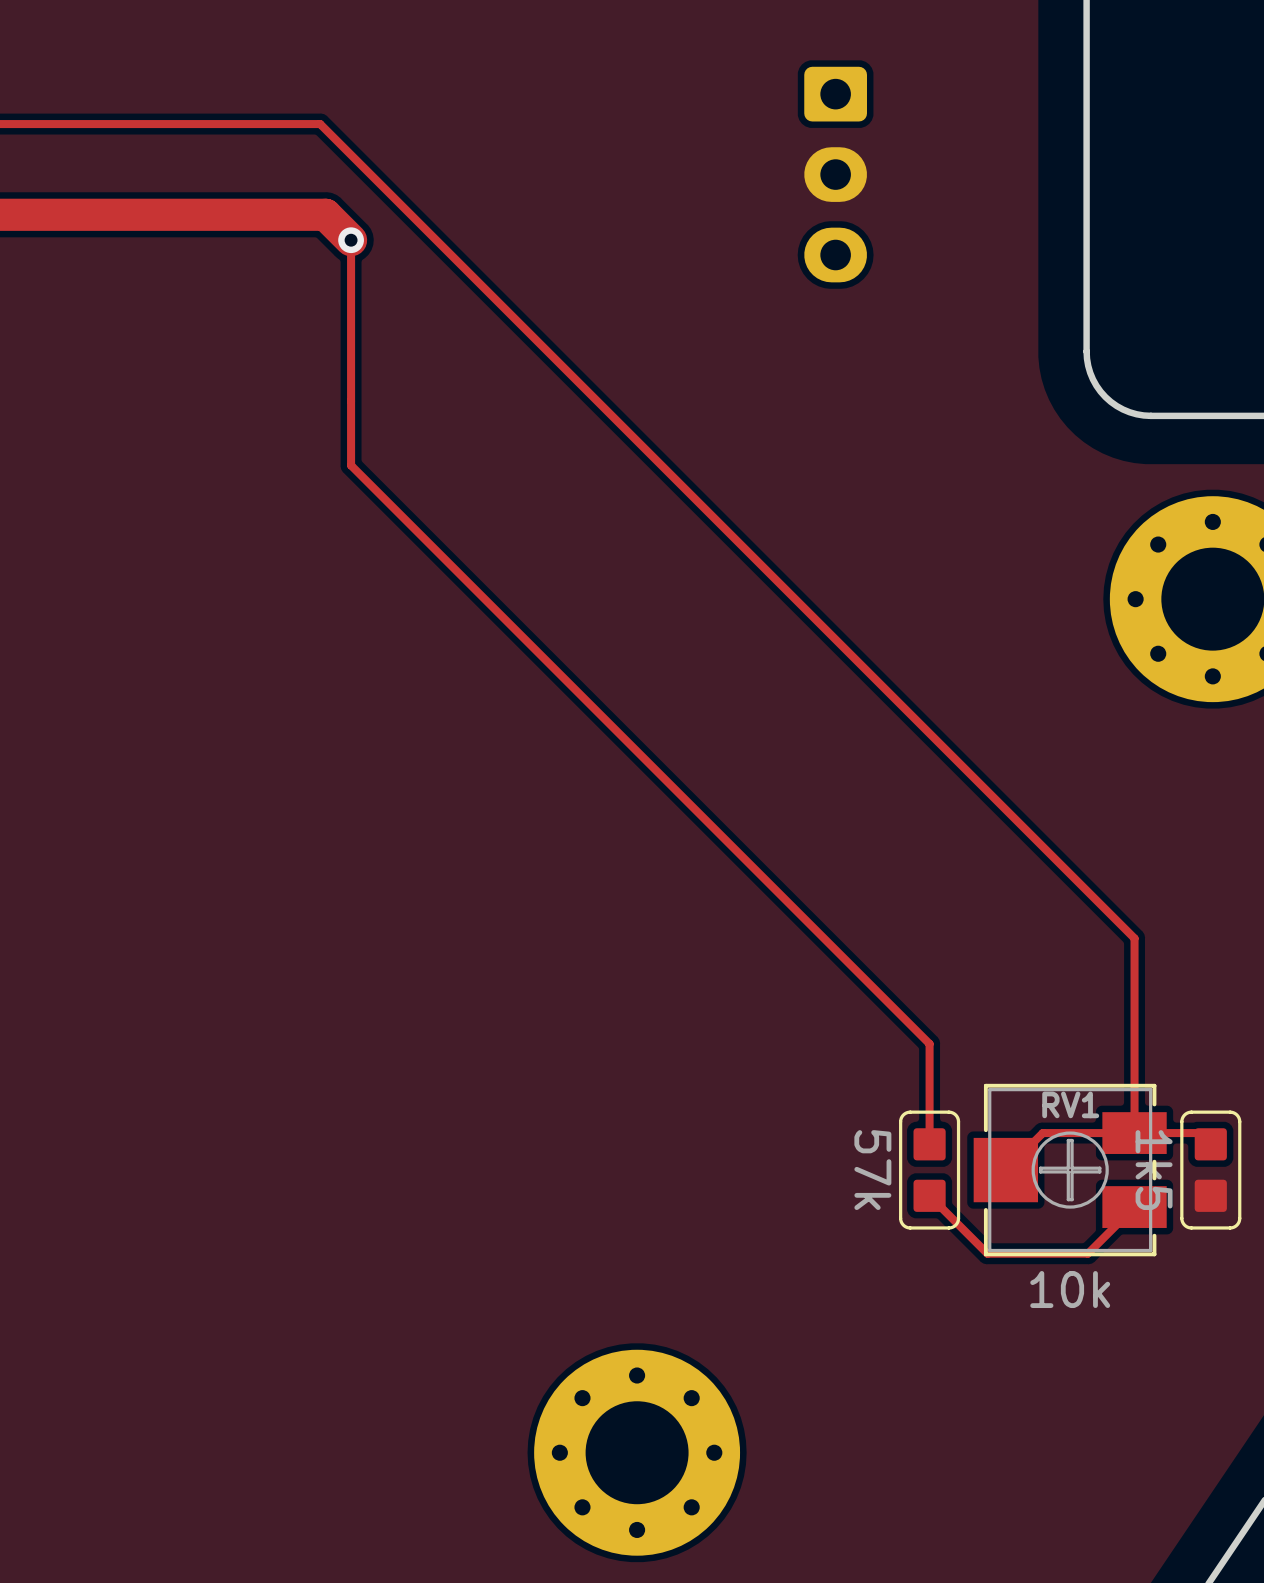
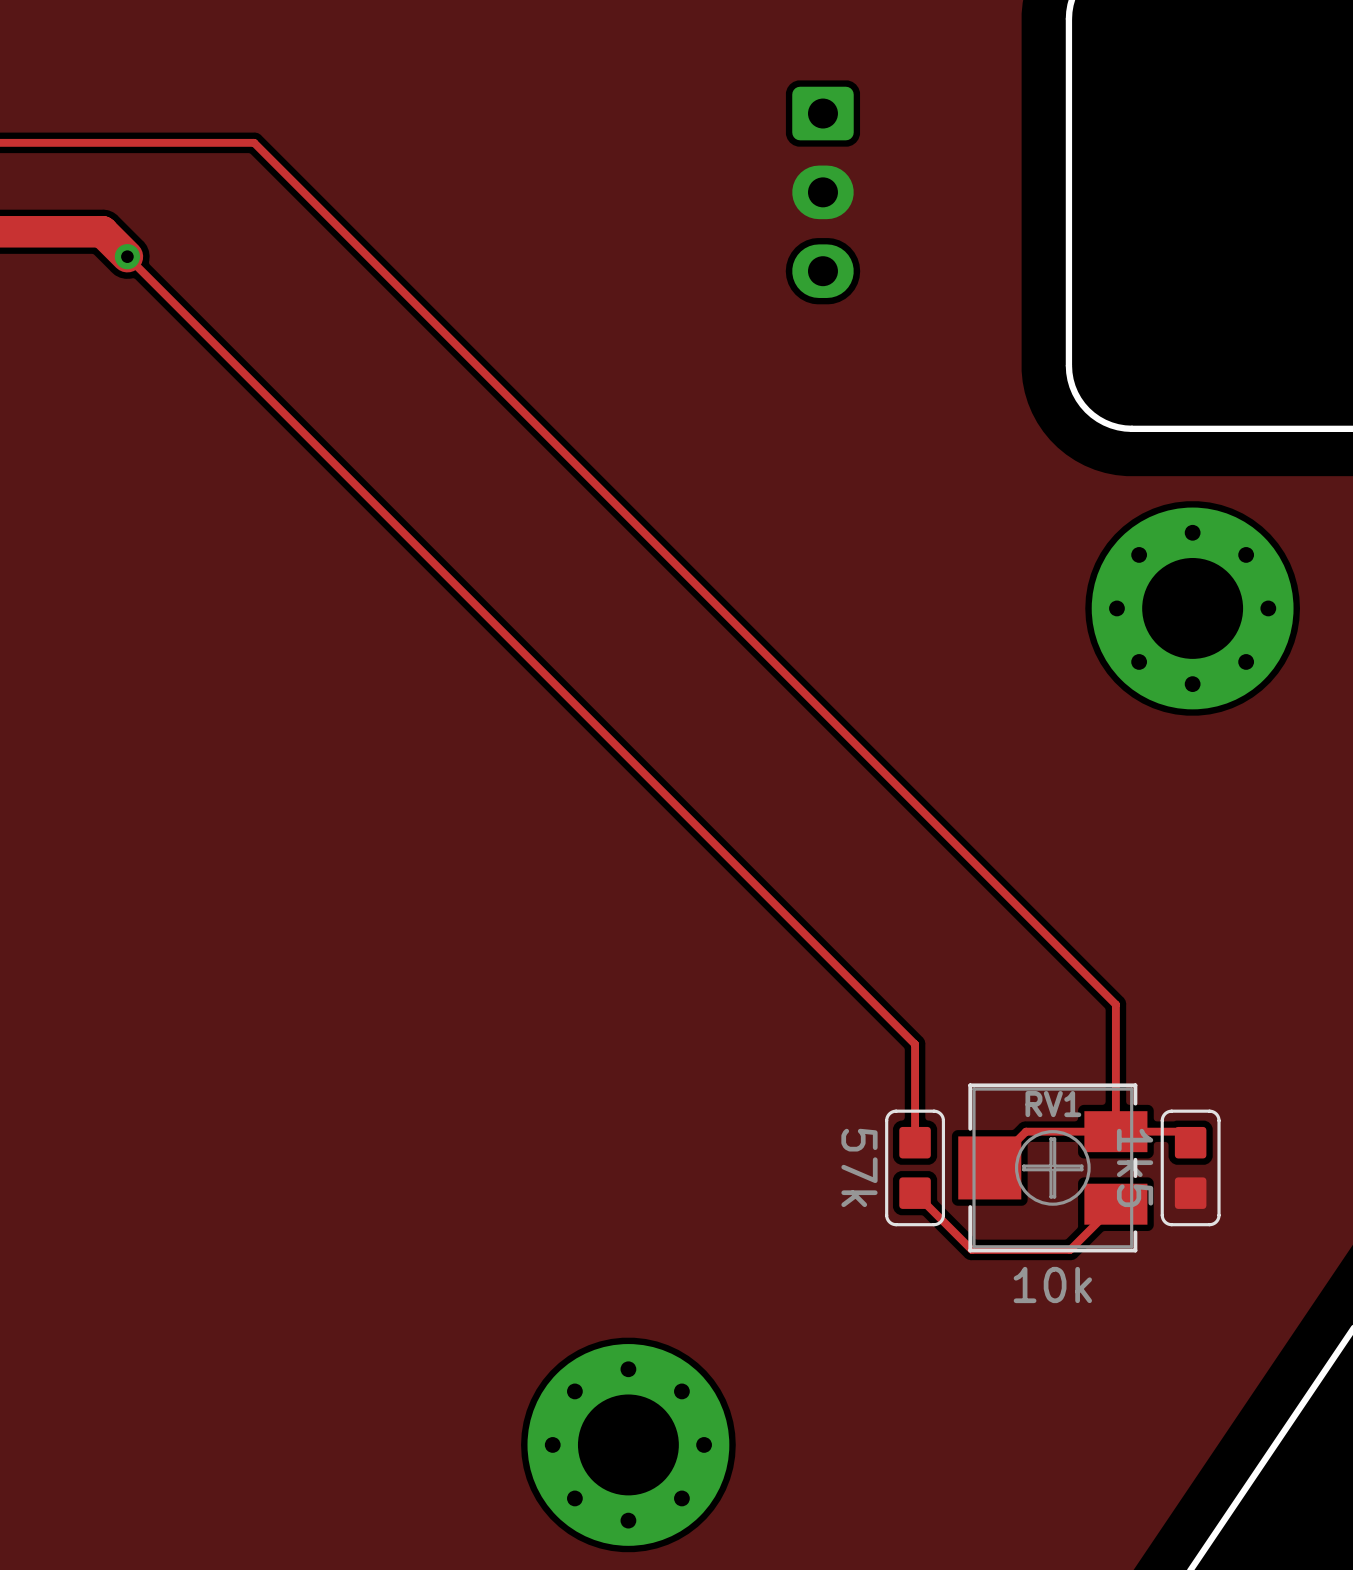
track: (255, 124) (320, 124) (1134, 938) (1134, 1003) -> (254, 142) (1115, 1004)
track: (100, 214) (325, 214) (351, 240) (351, 465) -> (102, 231) (348, 477)
via: none -> (127, 256)
via: (351, 240) -> none

